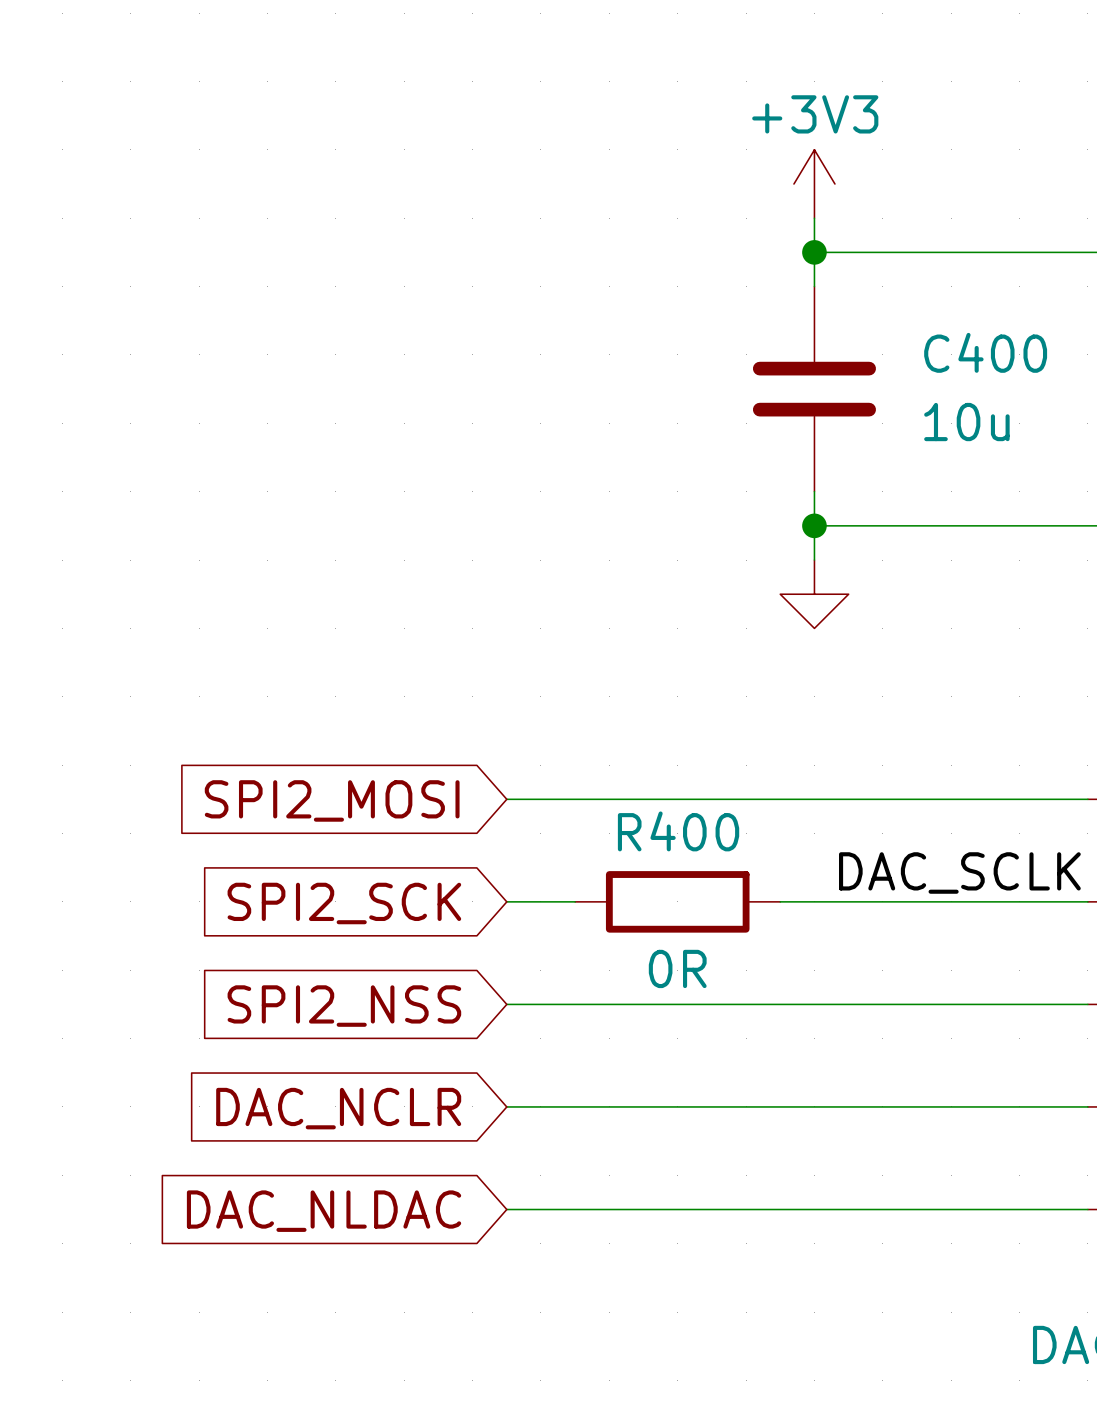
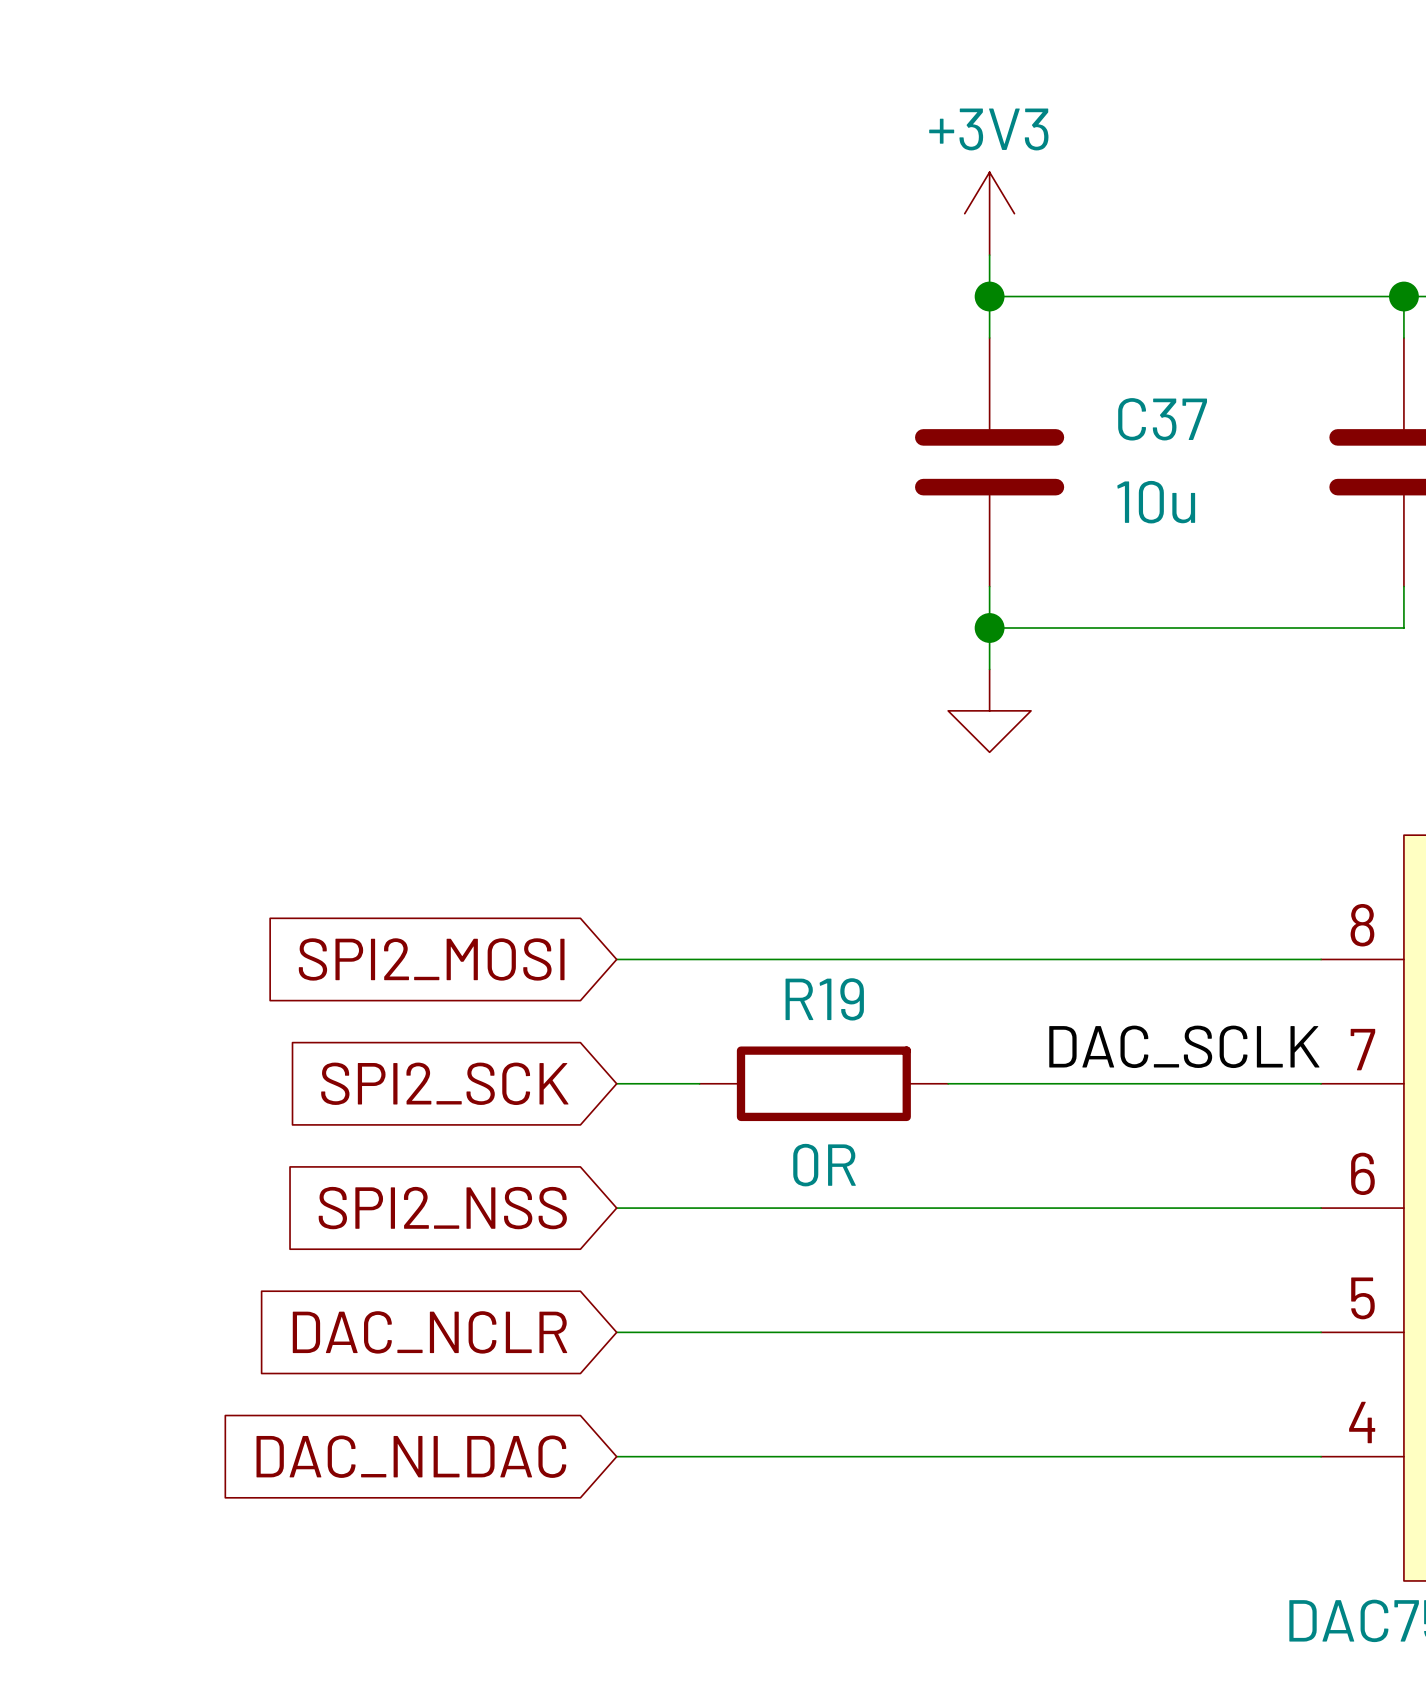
C400 name: C400 (985, 352) -> C37 (1162, 419)
R400 name: R400 (678, 831) -> R19 (824, 999)

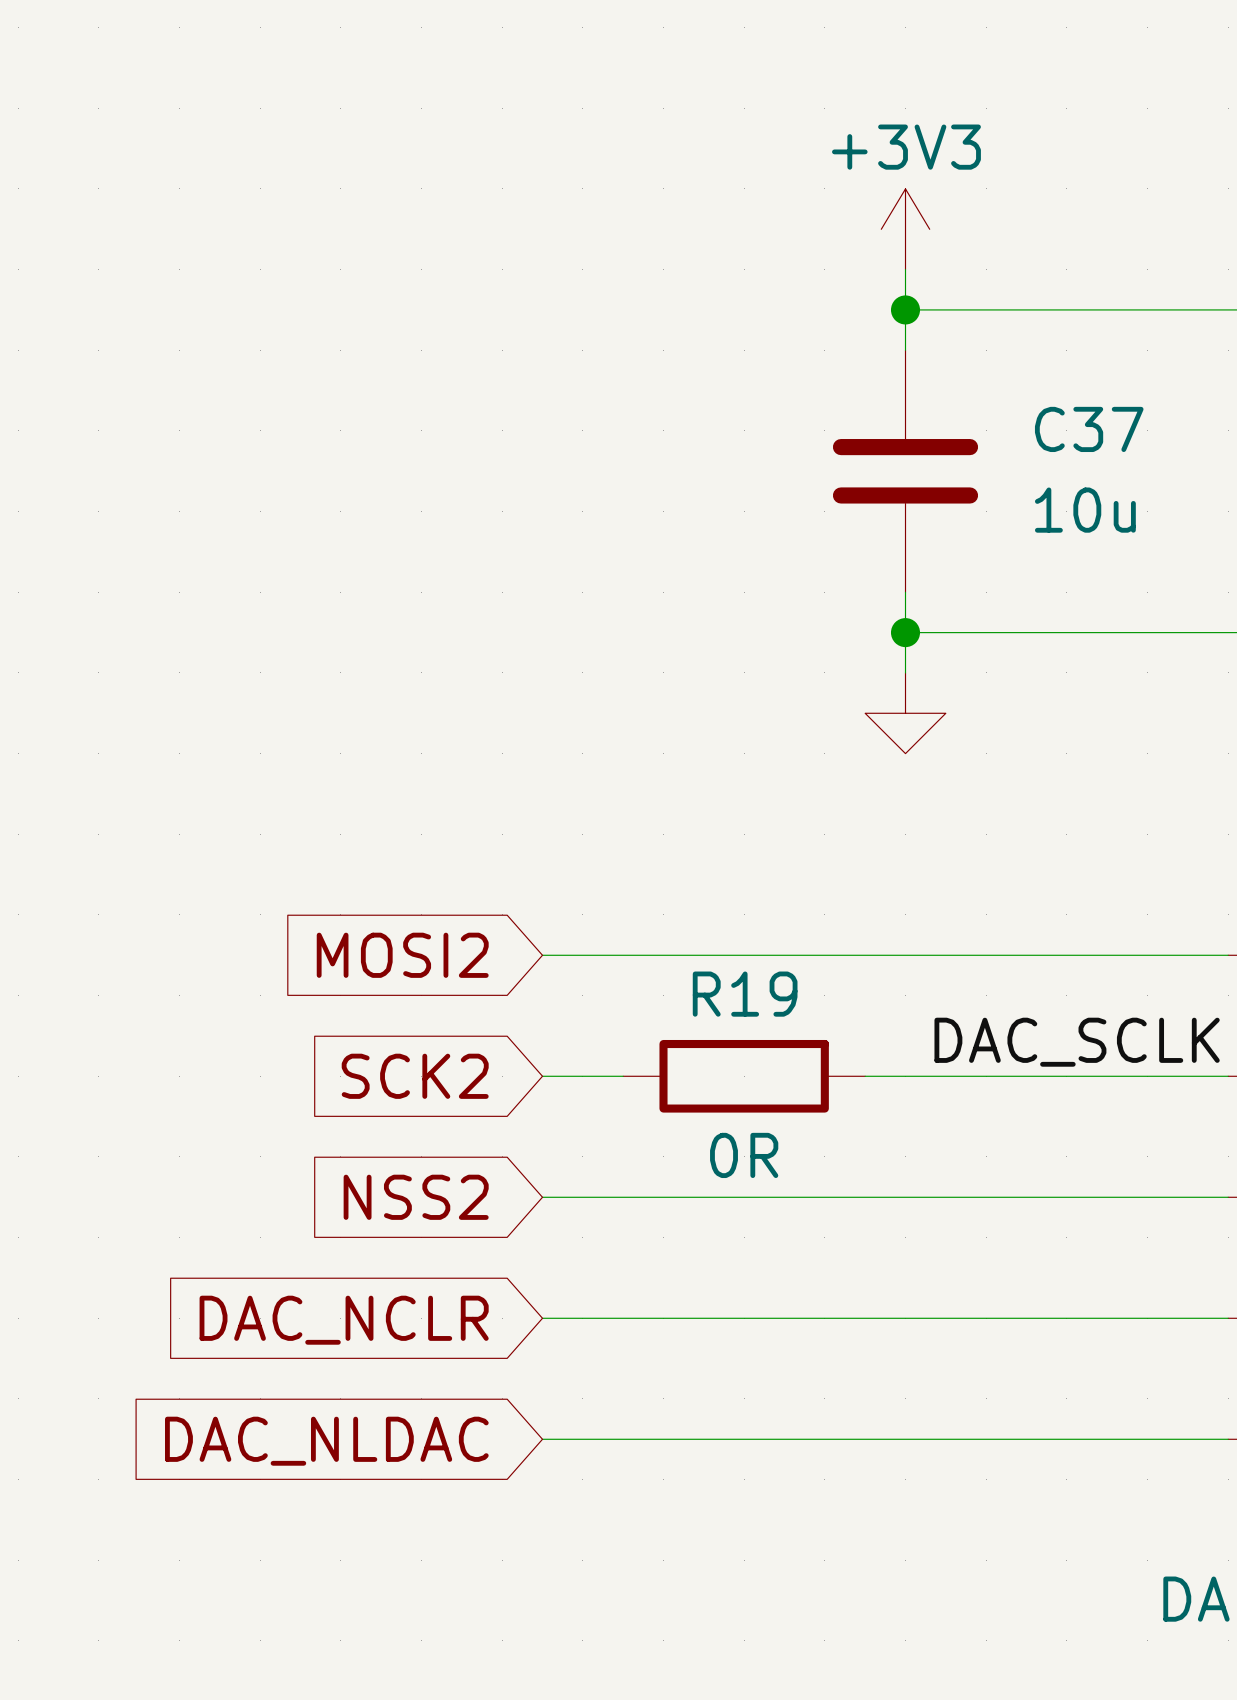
global label: SPI2_MOSI (431, 959) -> MOSI2 (402, 955)
global label: SPI2_SCK (444, 1083) -> SCK2 (415, 1076)
global label: SPI2_NSS (442, 1208) -> NSS2 (416, 1197)

